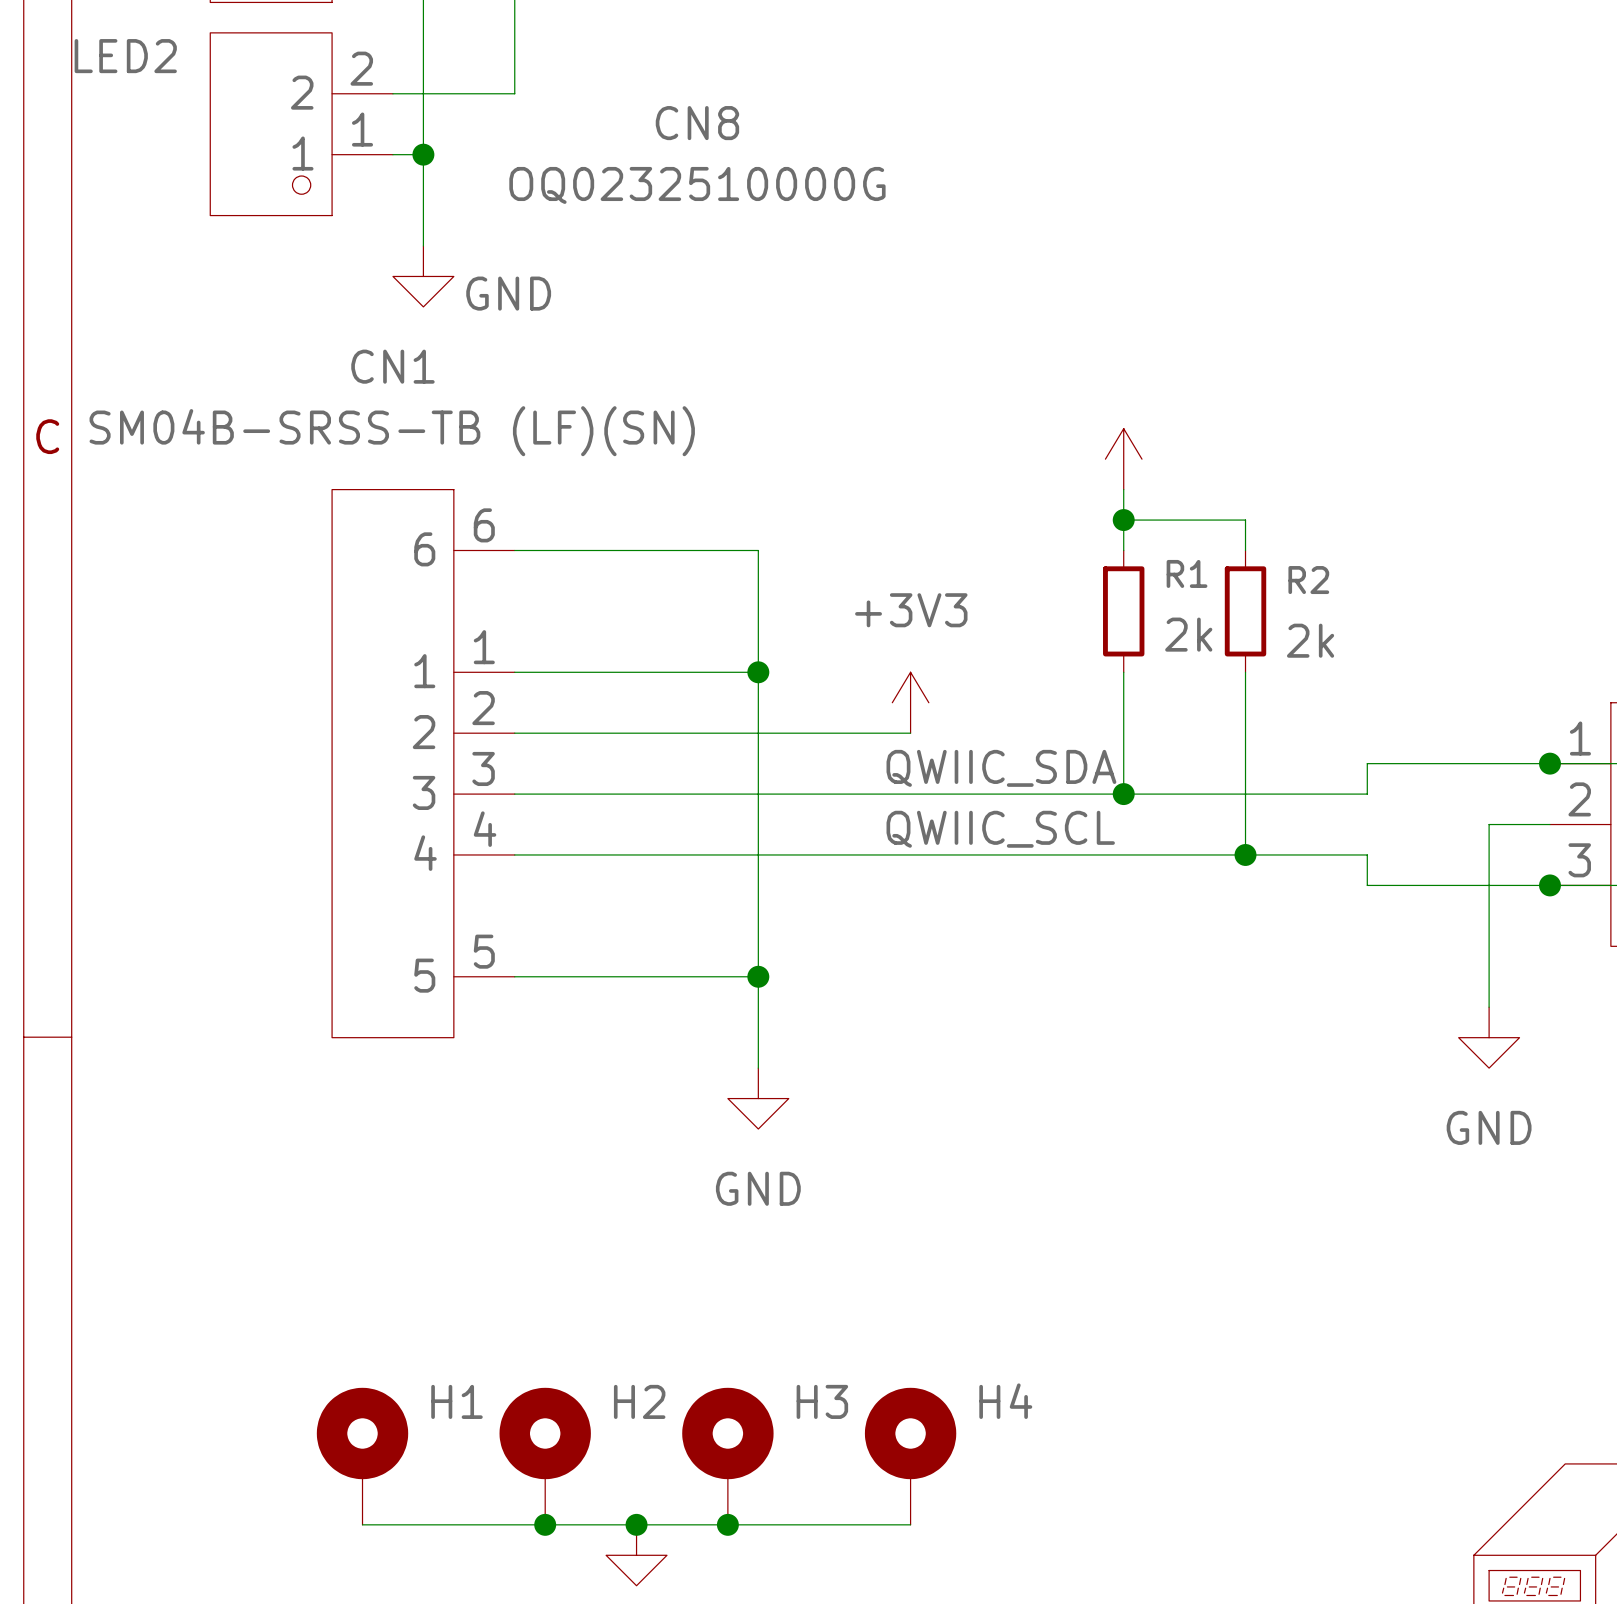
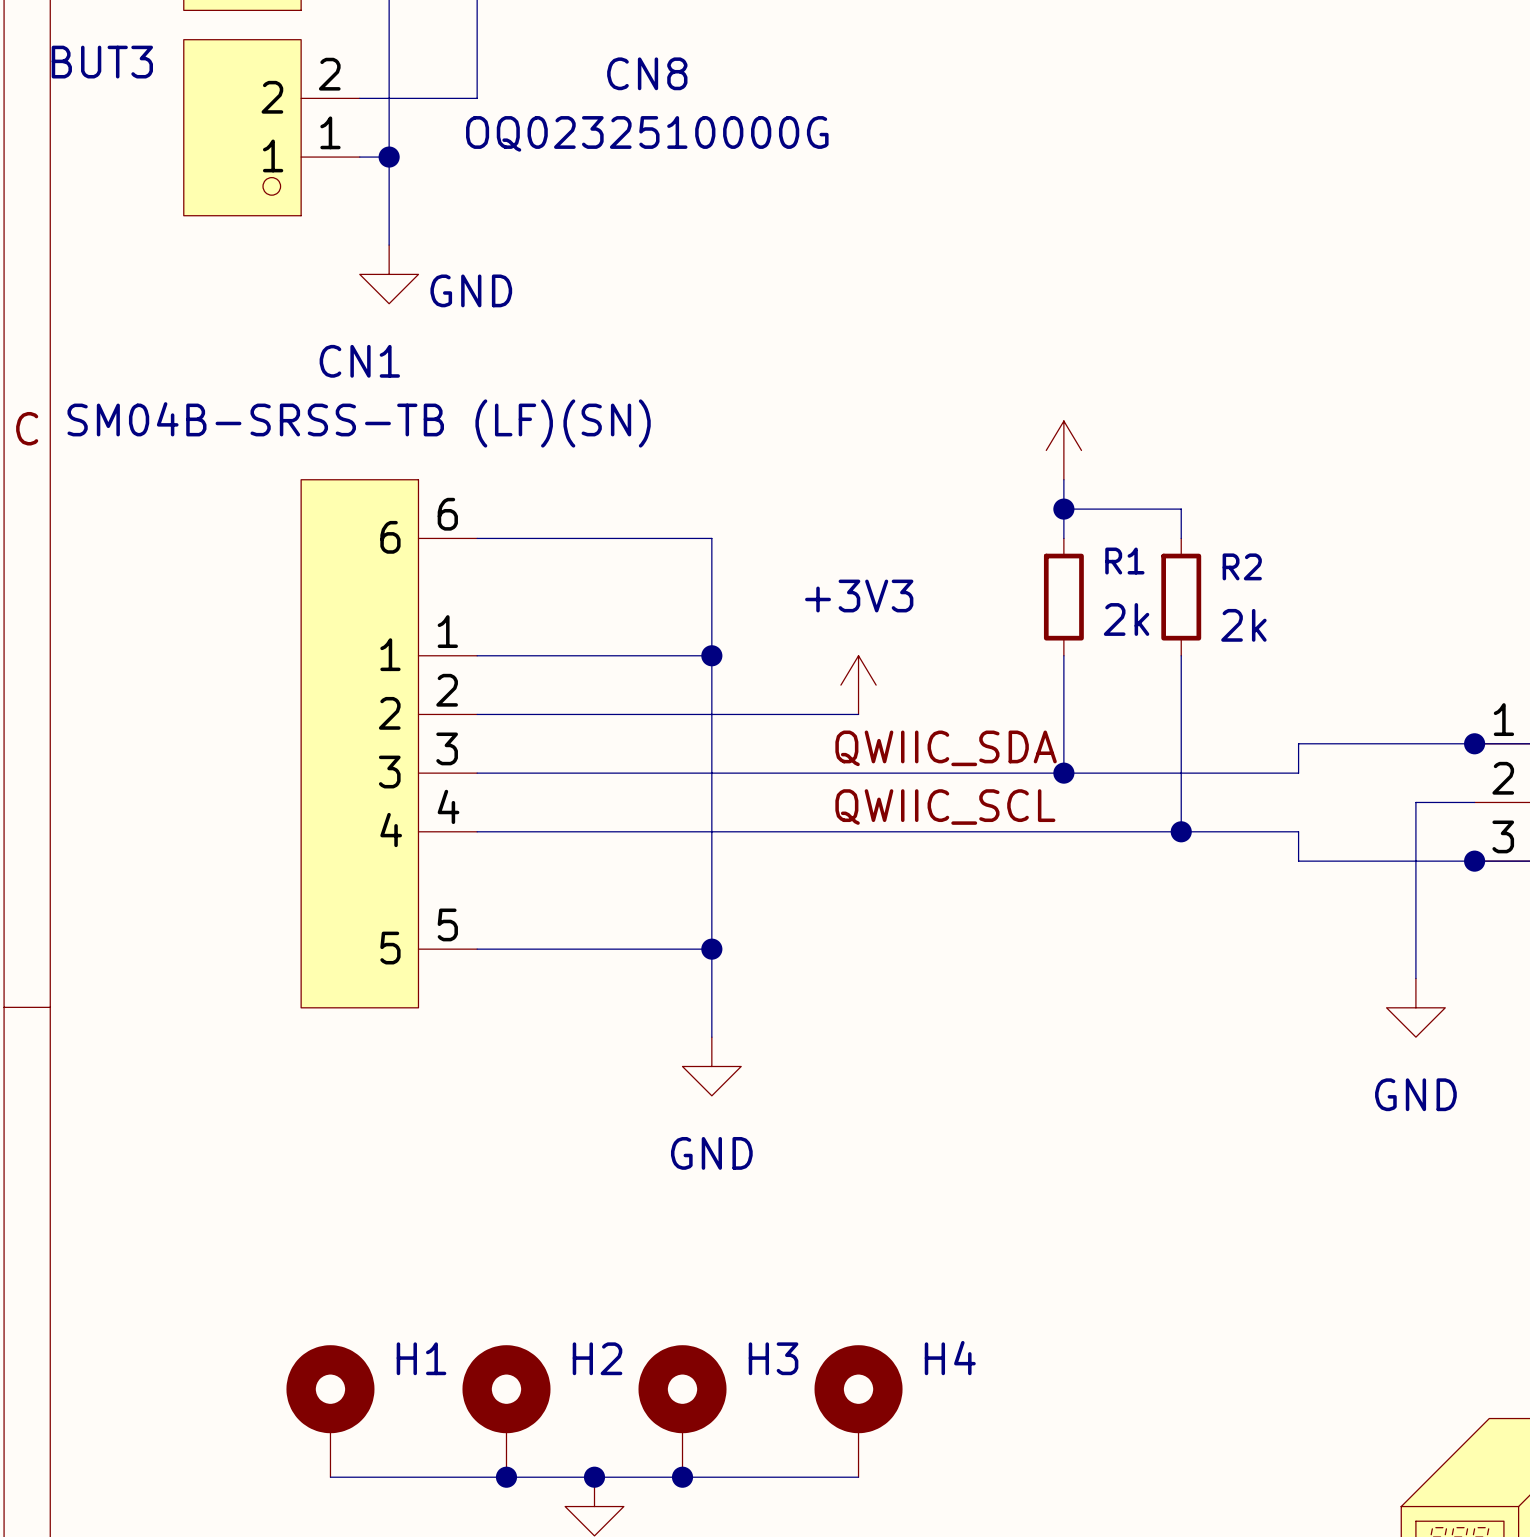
CN8 text: LED2 (125, 56) -> BUT3 (102, 62)
CN8 name position: CN8 (697, 123) -> CN8 (647, 73)
CN8 value position: OQ0232510000G (697, 185) -> OQ0232510000G (647, 133)

